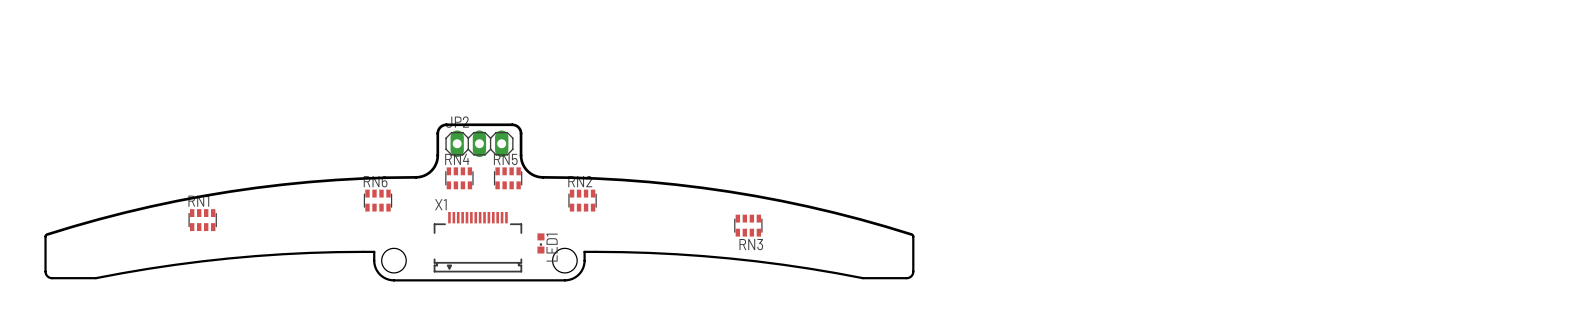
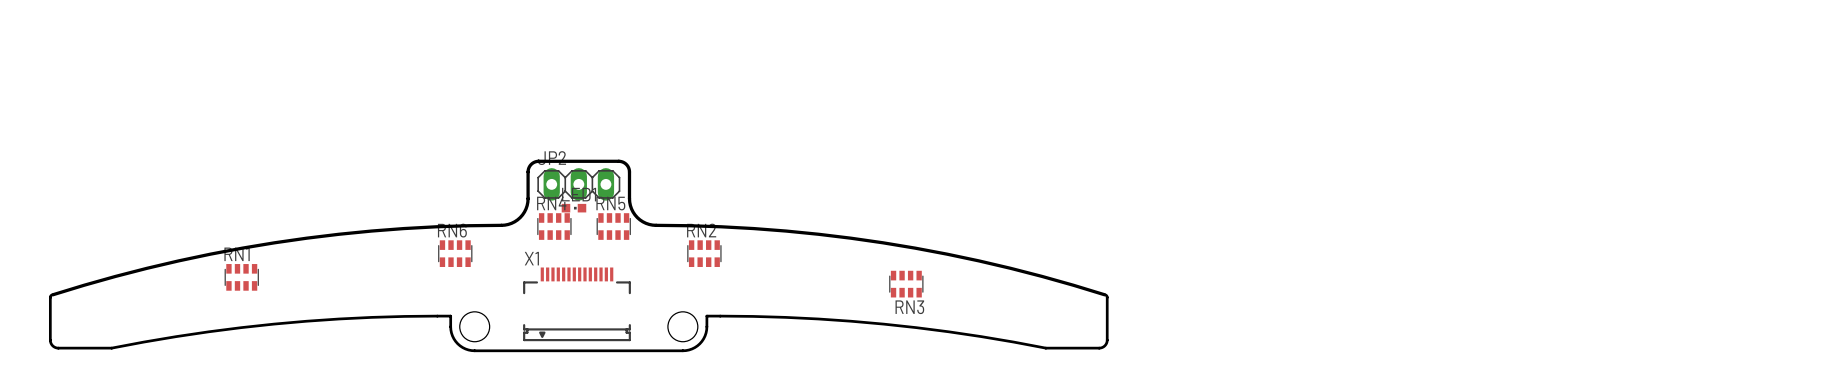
LED1 rotation: 0° (540, 243) -> 90° counterclockwise (573, 208)
LED1 position: (540, 243) -> (573, 208)

